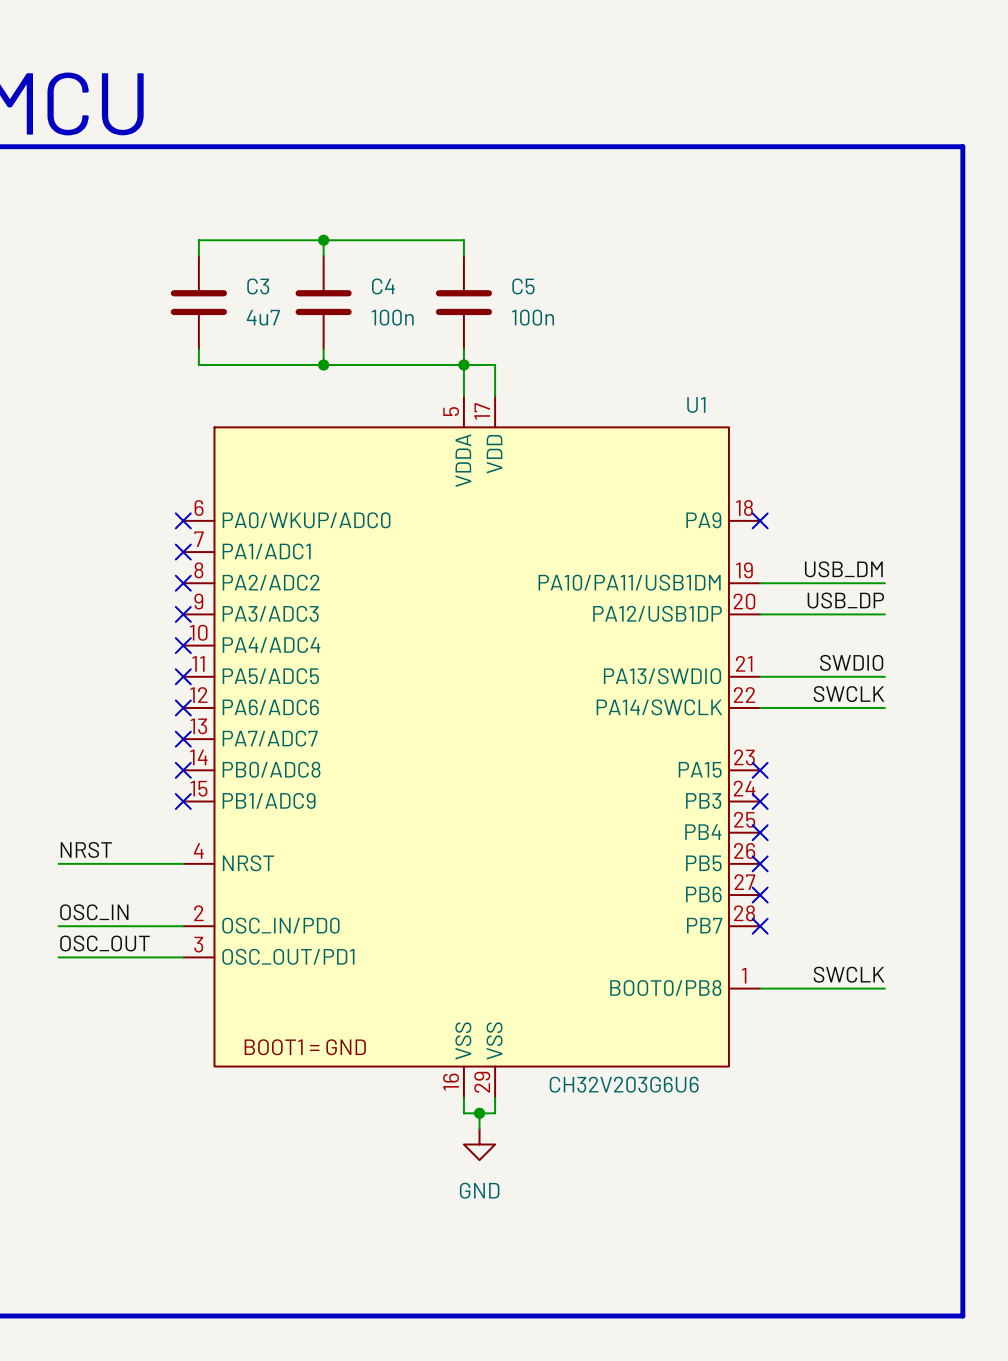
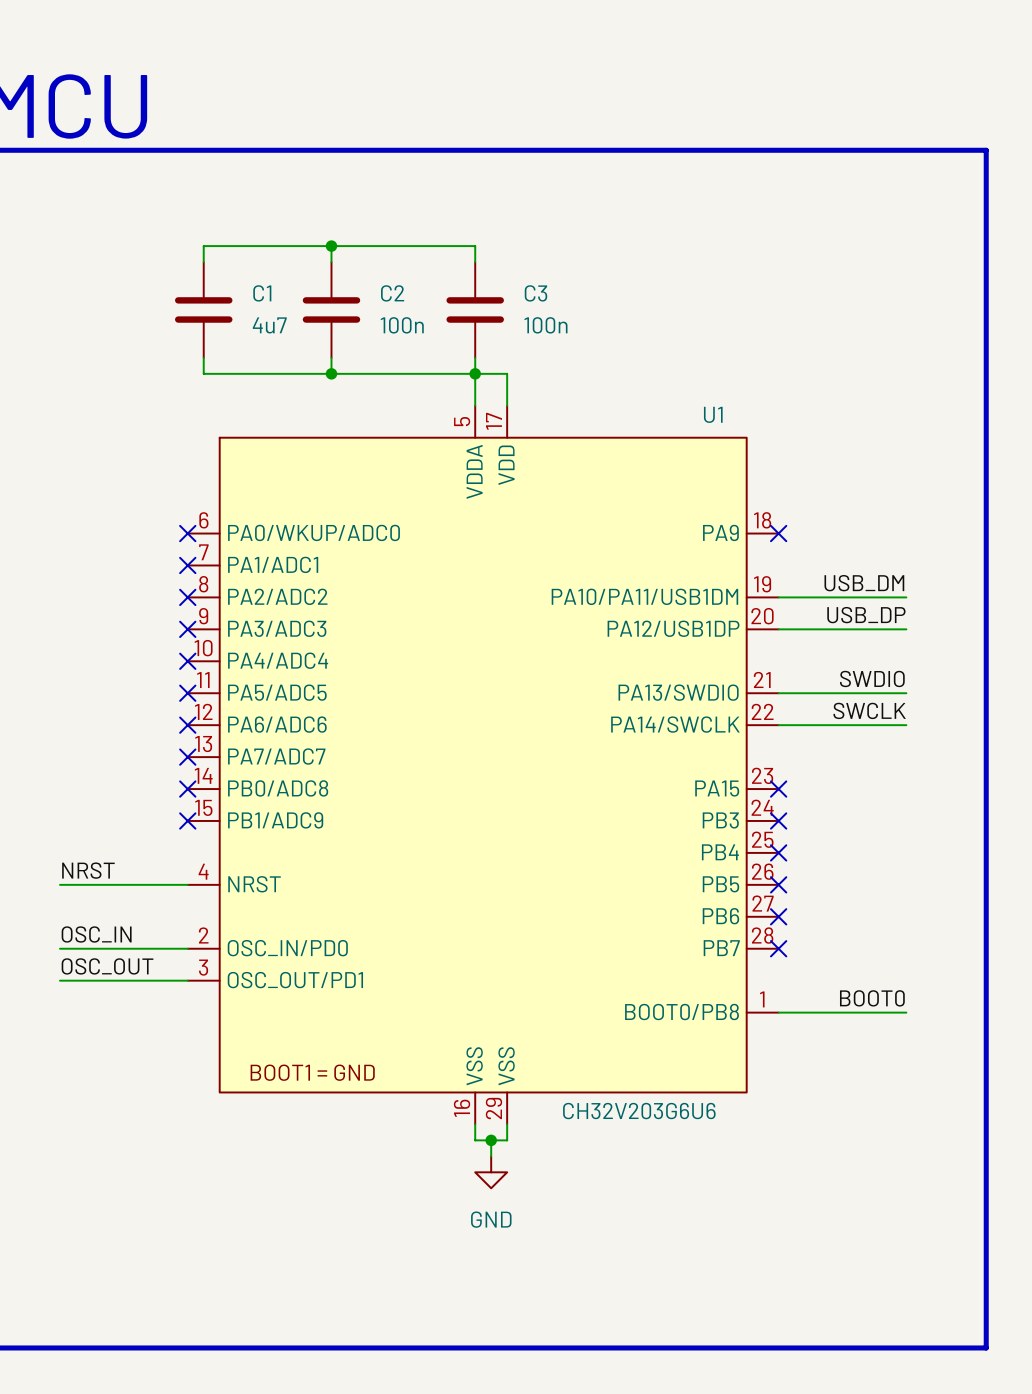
C3 name: C3 (258, 286) -> C1 (262, 293)
C4 name: C4 (383, 286) -> C2 (392, 293)
C5 name: C5 (523, 286) -> C3 (536, 293)
label: SWCLK (848, 974) -> BOOT0 (872, 998)

